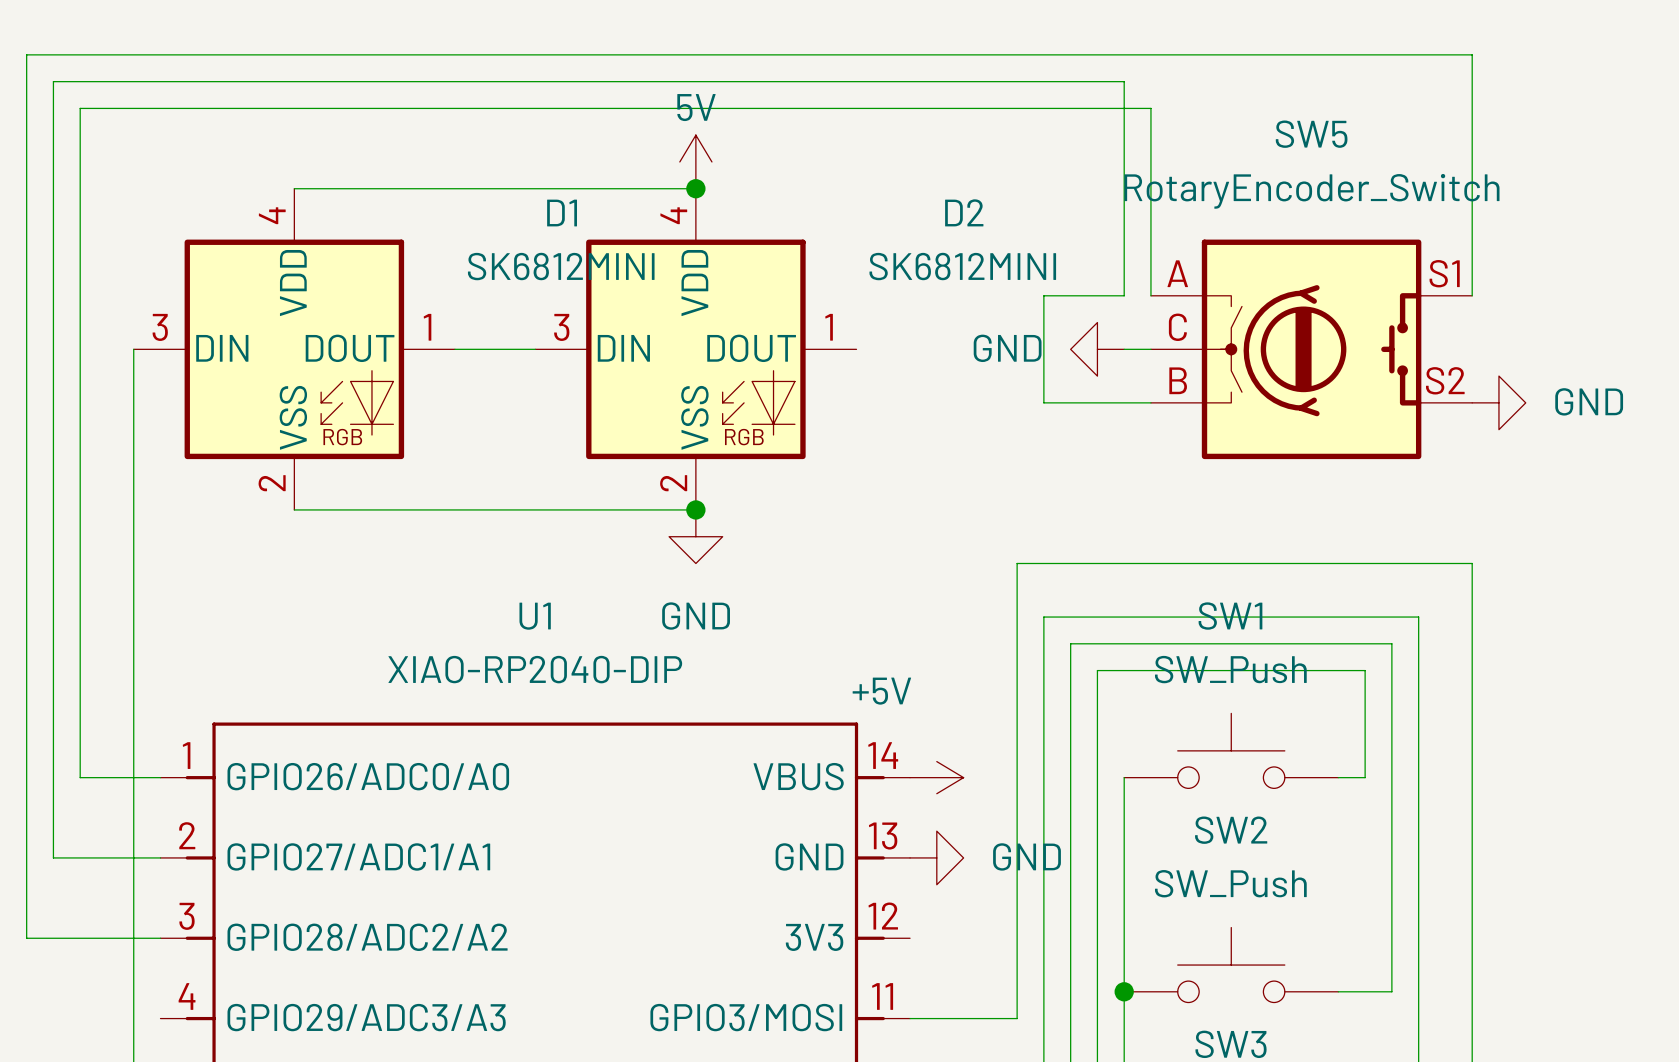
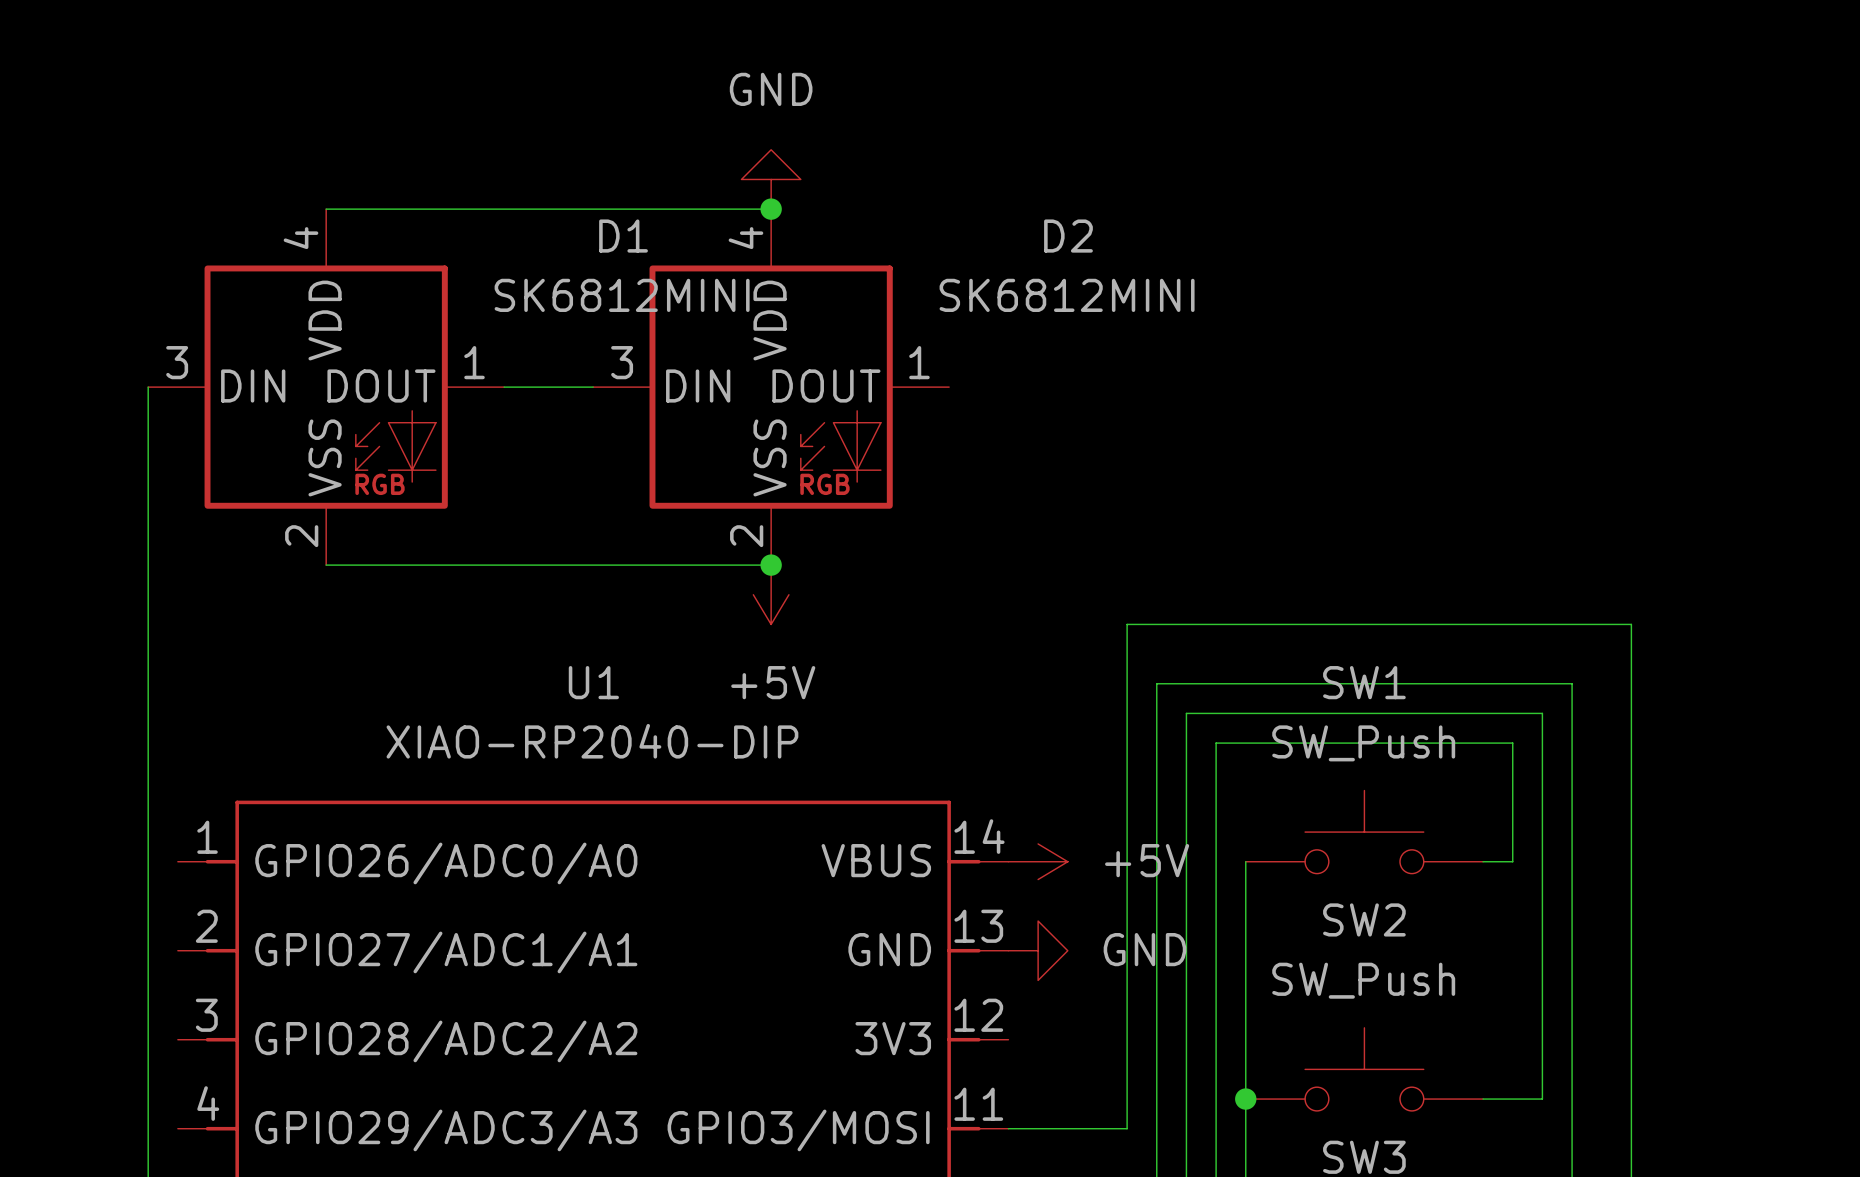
power symbol: 5V (695, 161) -> GND (771, 179)
wire: (1150, 295) (1150, 108) (80, 108) (80, 777) (160, 777) -> none
wire: (1472, 295) (1472, 54) (26, 54) (26, 938) (160, 938) -> none
power symbol: GND (1097, 349) -> none
wire: (1124, 349) (1150, 349) -> none
SW5: RotaryEncoder_Switch (1311, 349) -> none
wire: (1150, 402) (1043, 402) (1043, 295) (1124, 295) (1124, 81) (53, 81) (53, 857) (160, 857) -> none
power symbol: GND (1498, 402) -> none
power symbol: GND (695, 536) -> +5V (771, 594)
power symbol text position: +5V (881, 691) -> +5V (1147, 860)

